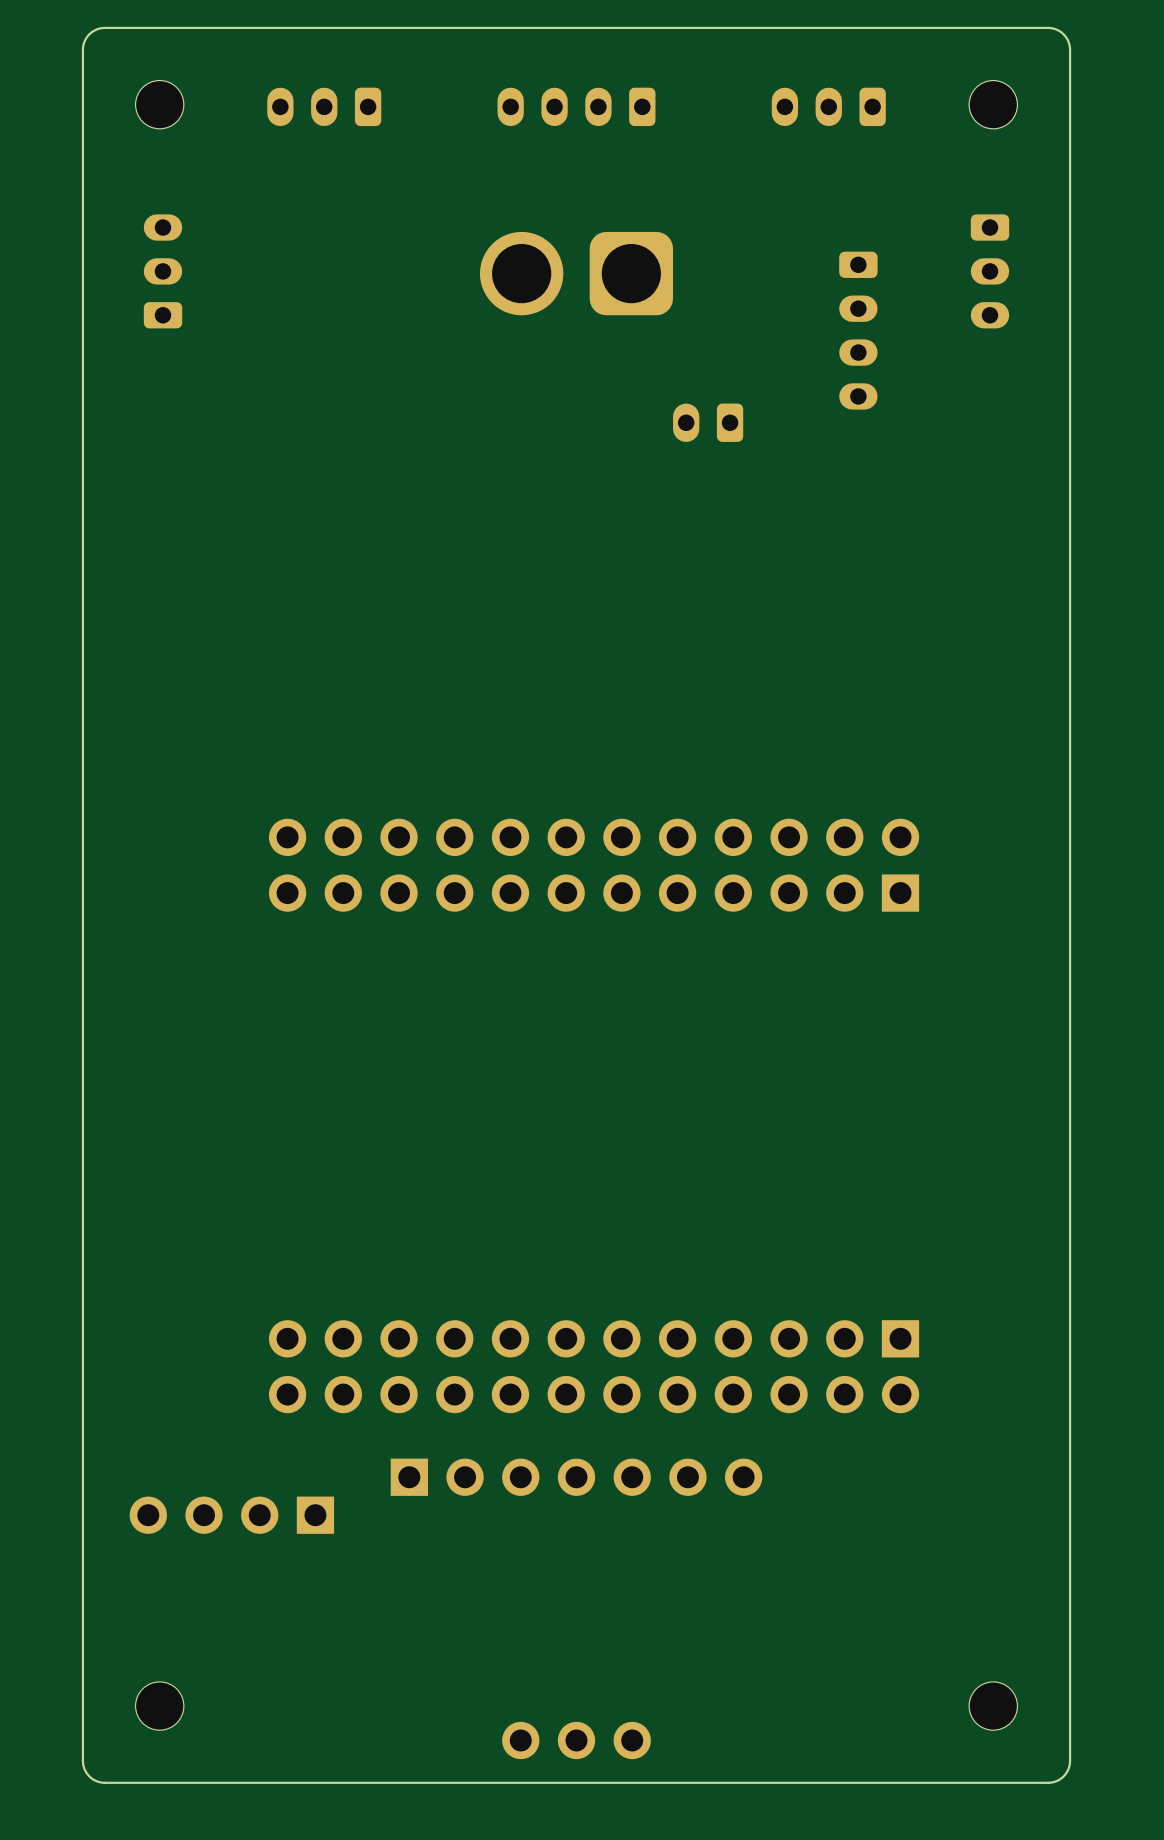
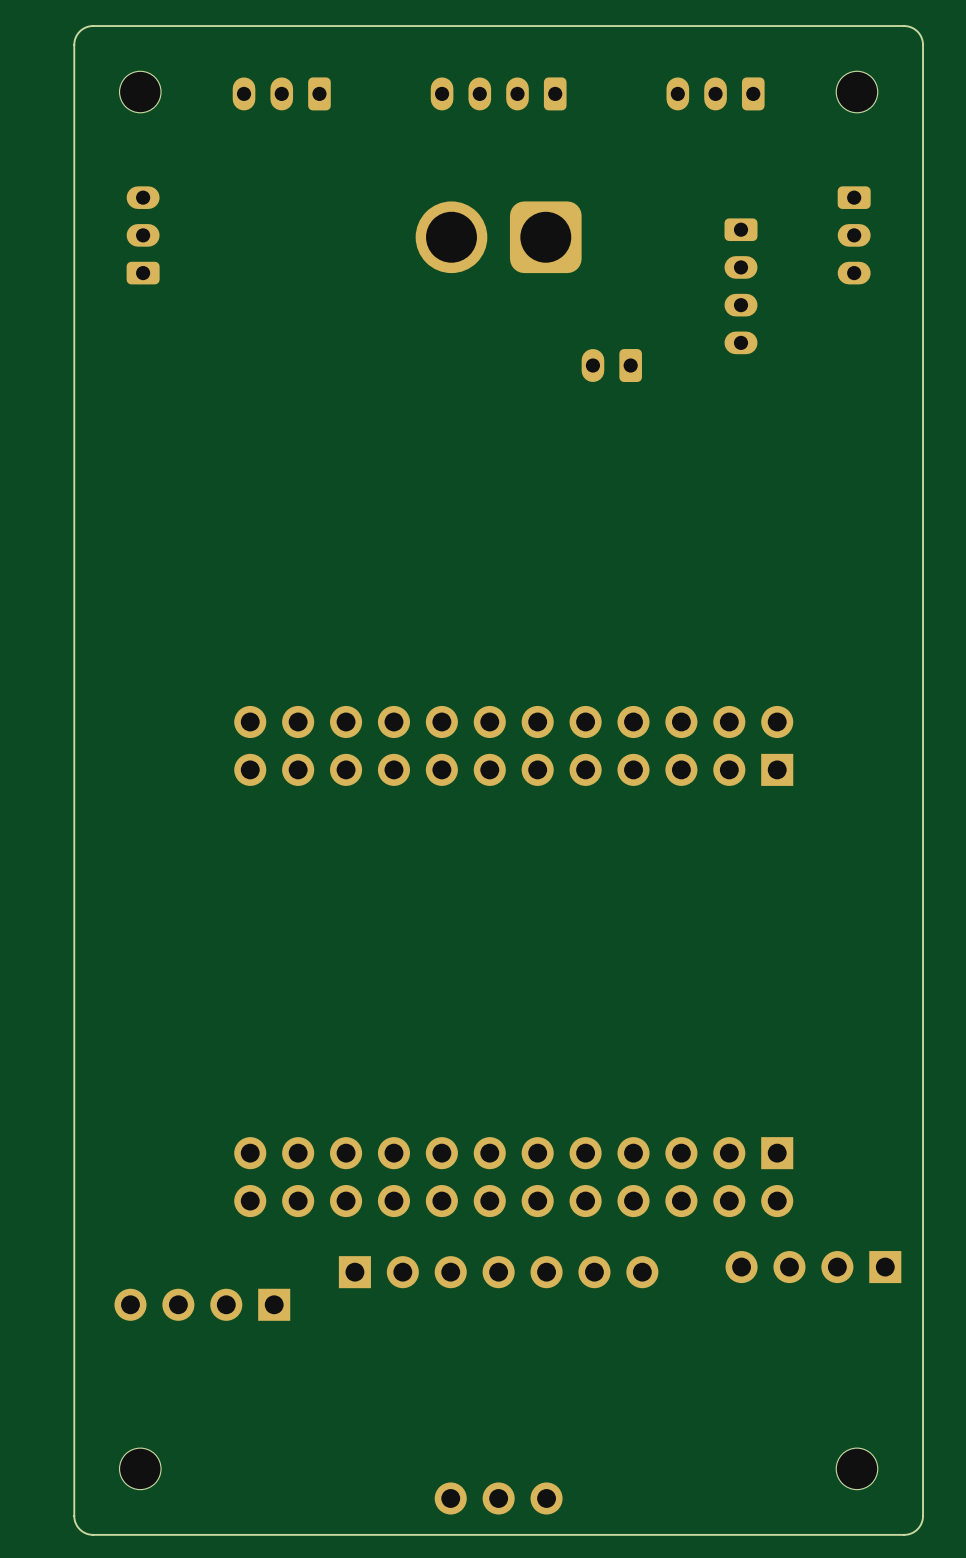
part: none -> (813, 1267)

